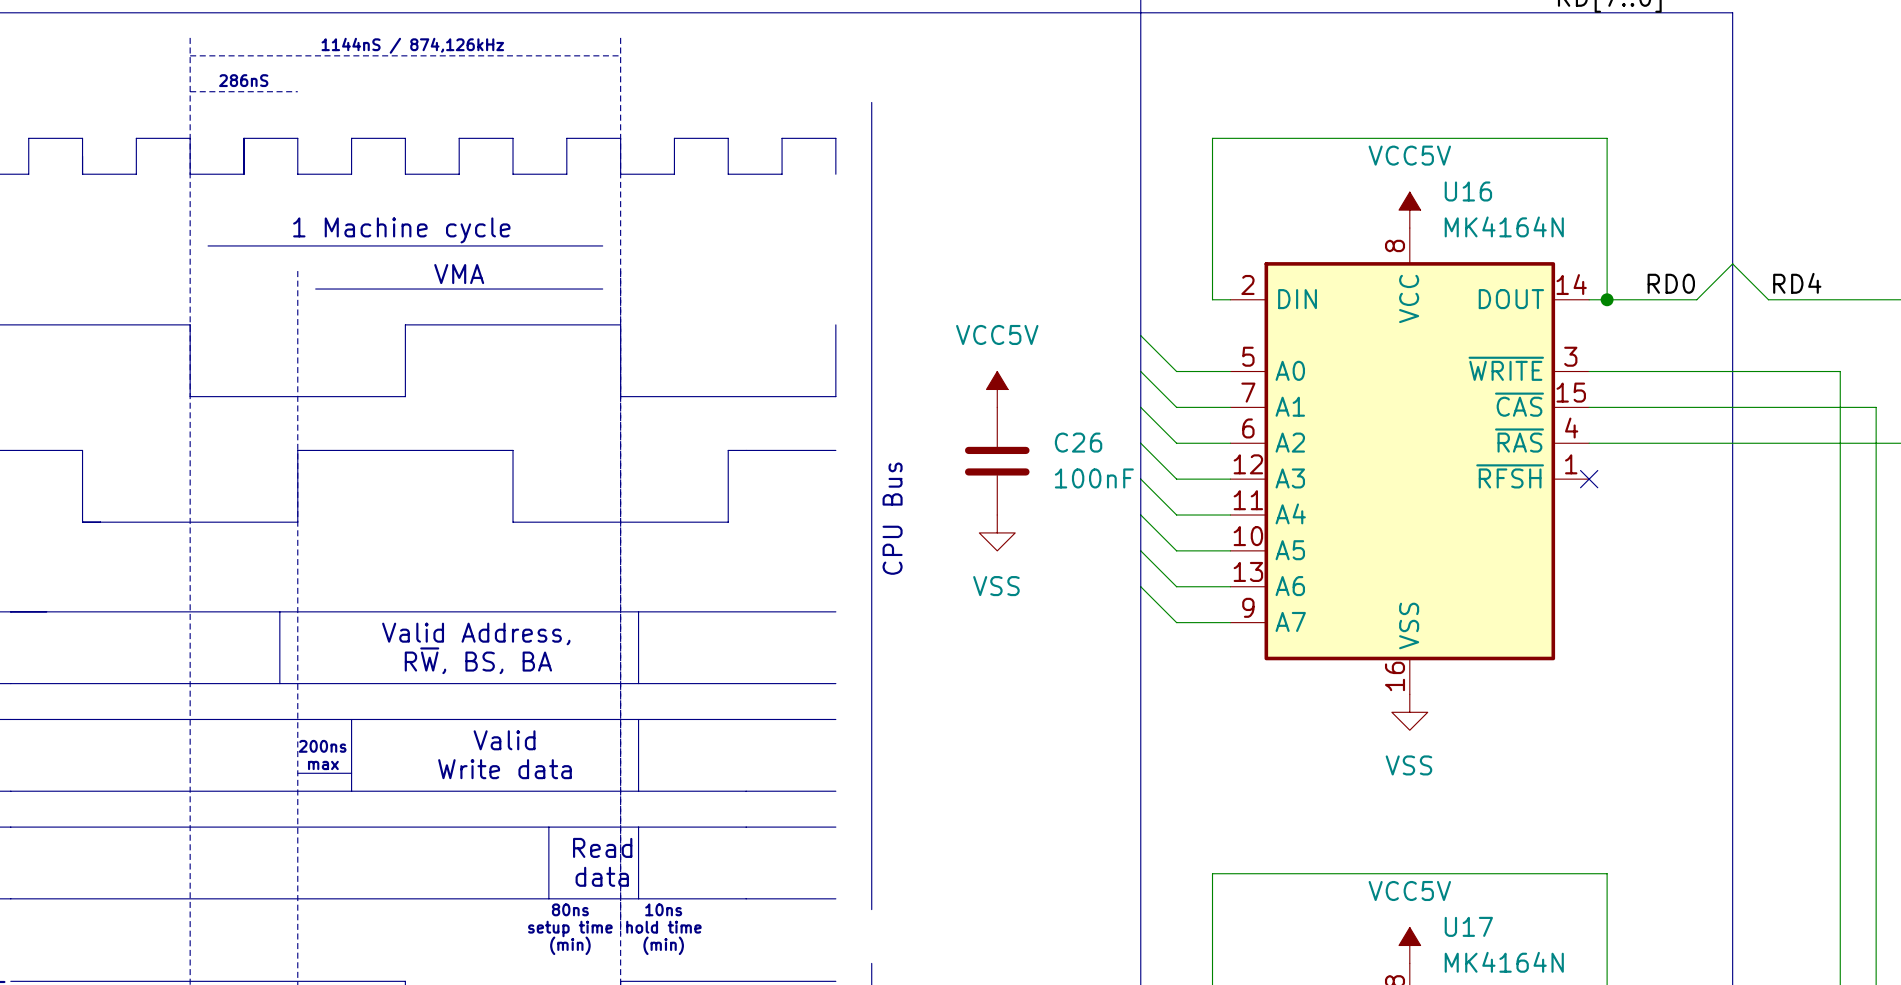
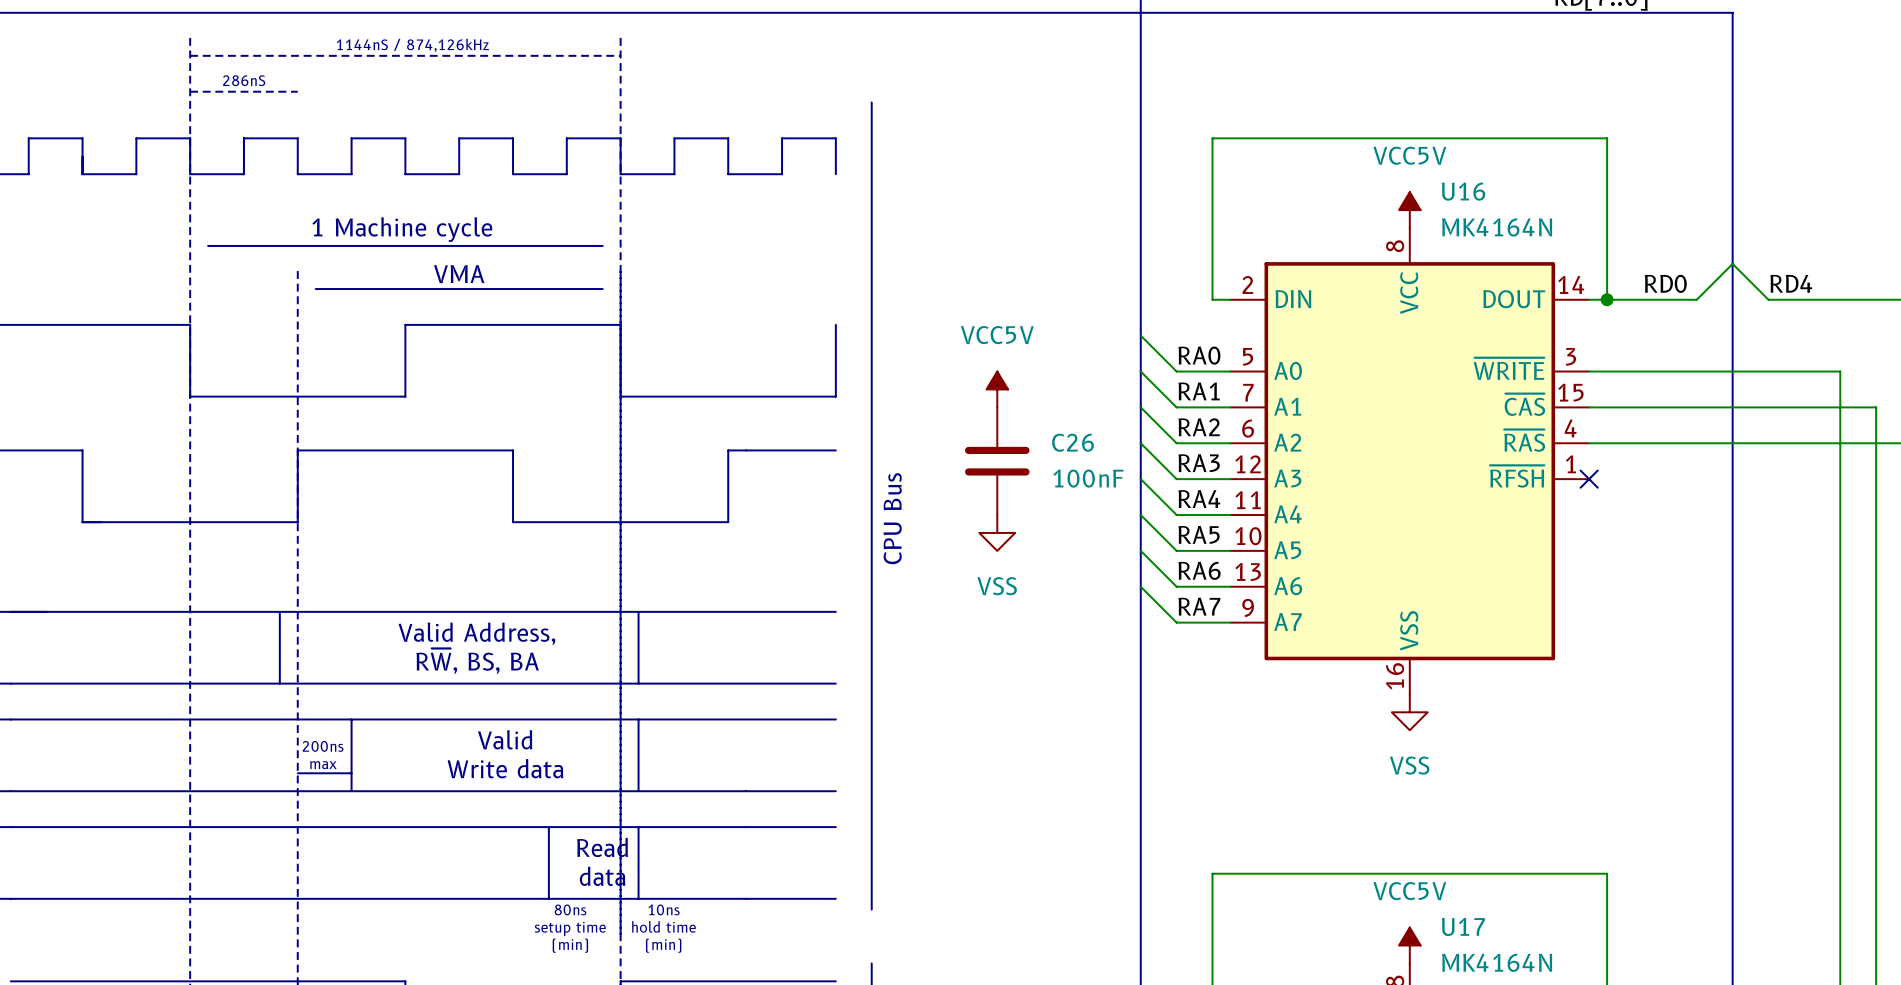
label: none -> RA0 (1199, 355)
label: none -> RA1 (1199, 391)
label: none -> RA2 (1199, 427)
label: none -> RA3 (1199, 463)
label: none -> RA4 (1199, 499)
label: none -> RA5 (1199, 534)
label: none -> RA6 (1199, 570)
label: none -> RA7 (1199, 606)

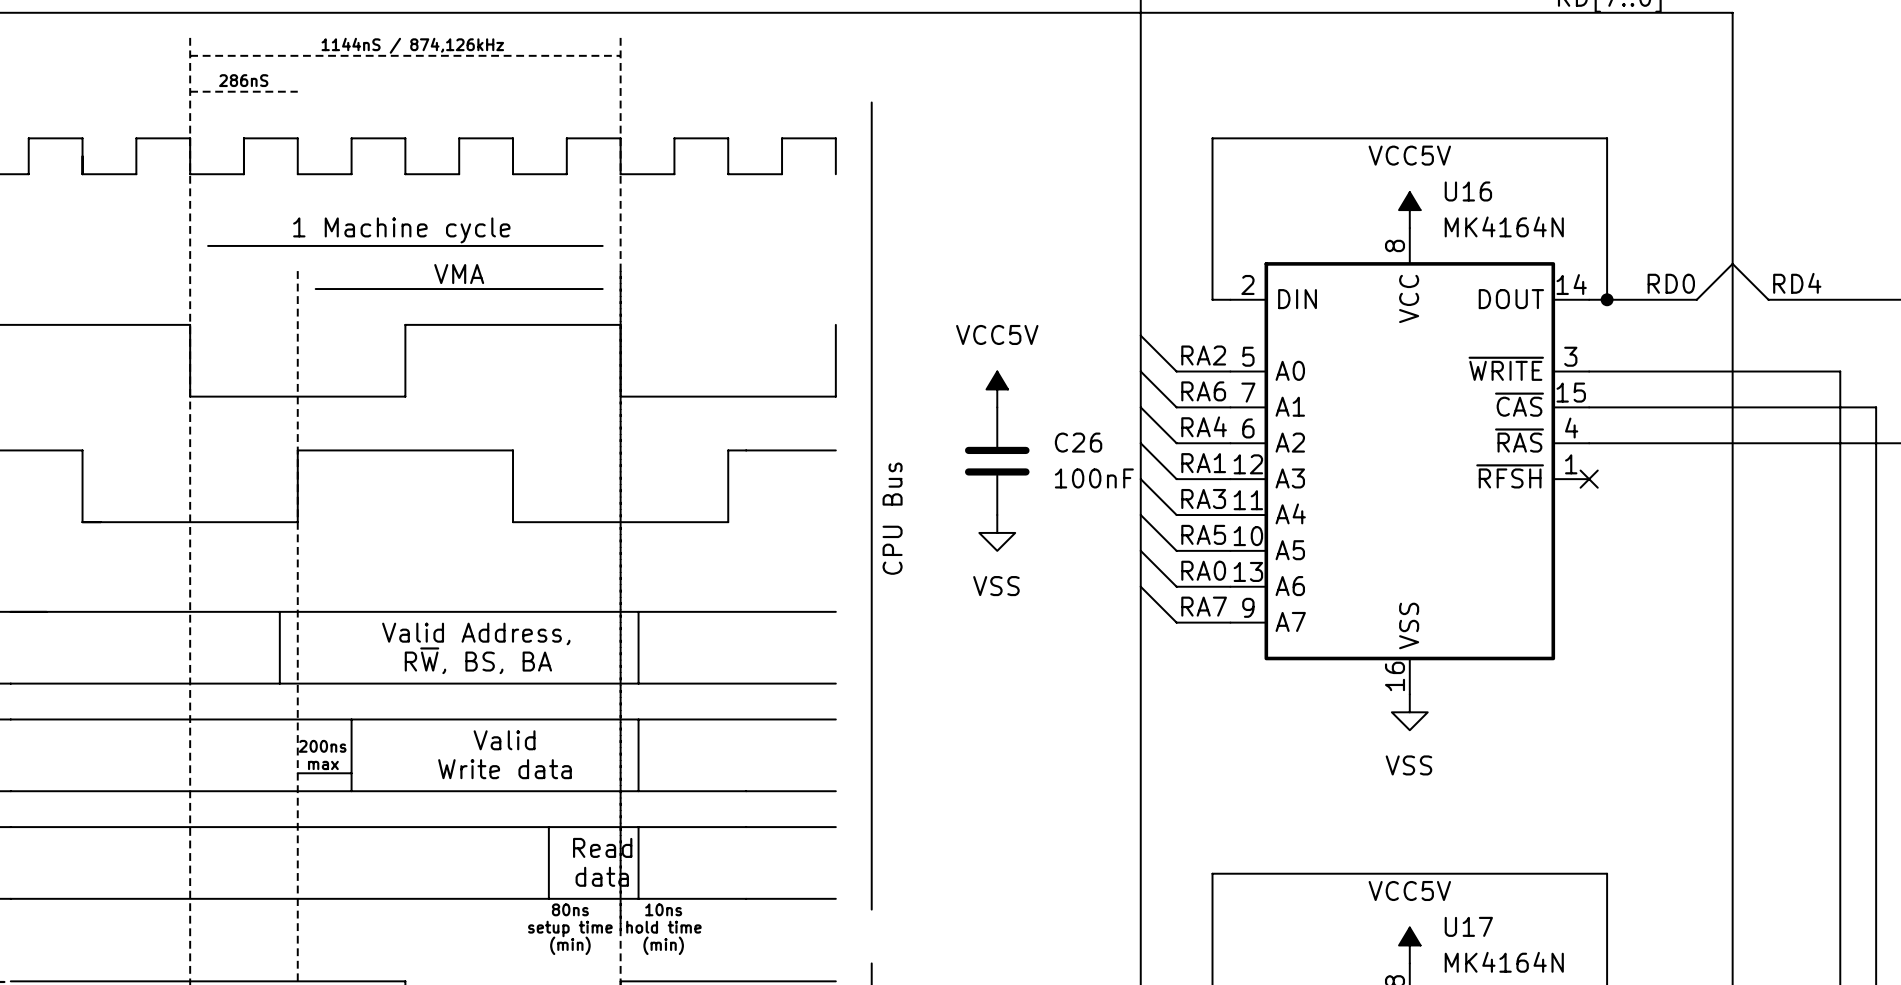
label: RA0 (1199, 355) -> RA2 (1203, 355)
label: RA1 (1199, 391) -> RA6 (1203, 391)
label: RA2 (1199, 427) -> RA4 (1204, 426)
label: RA3 (1199, 463) -> RA1 (1203, 463)
label: RA4 (1199, 499) -> RA3 (1203, 499)
label: RA6 (1199, 570) -> RA0 (1203, 570)

